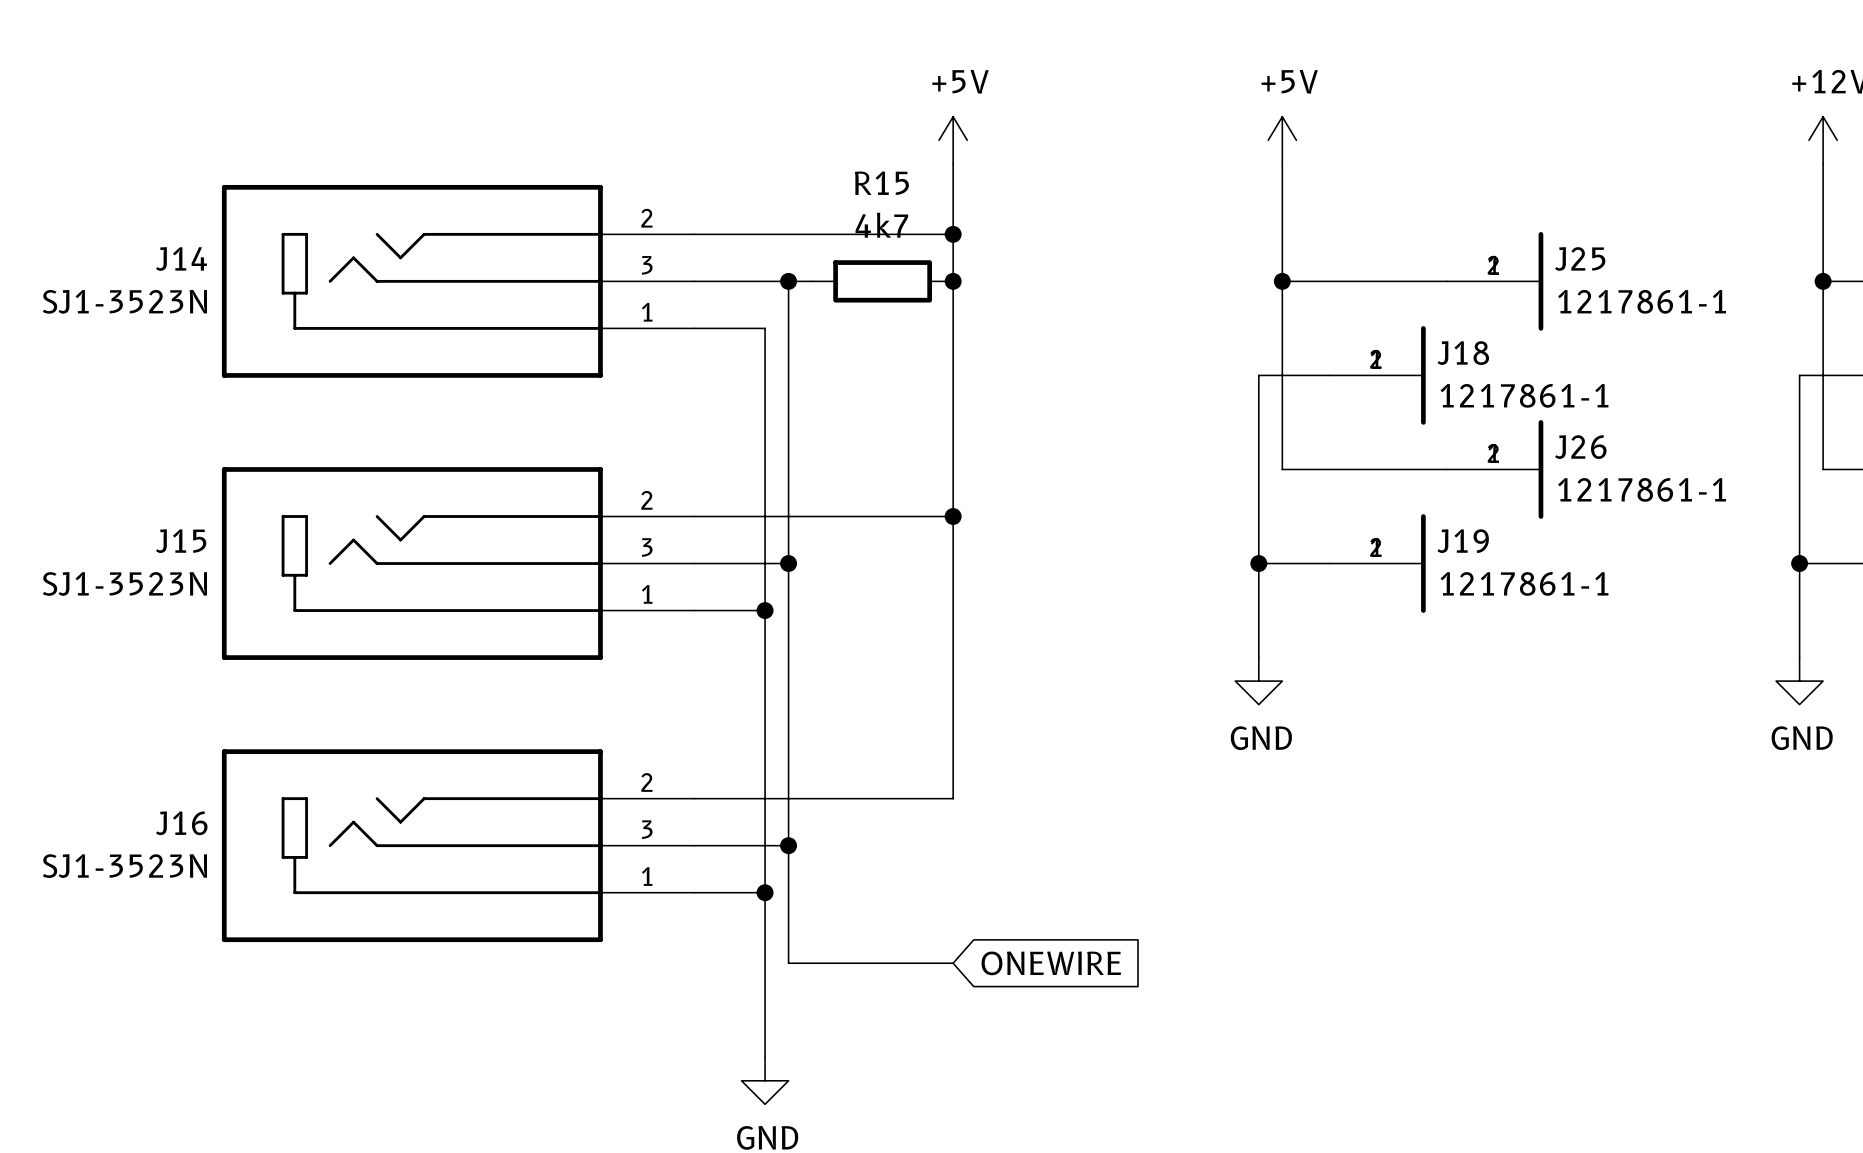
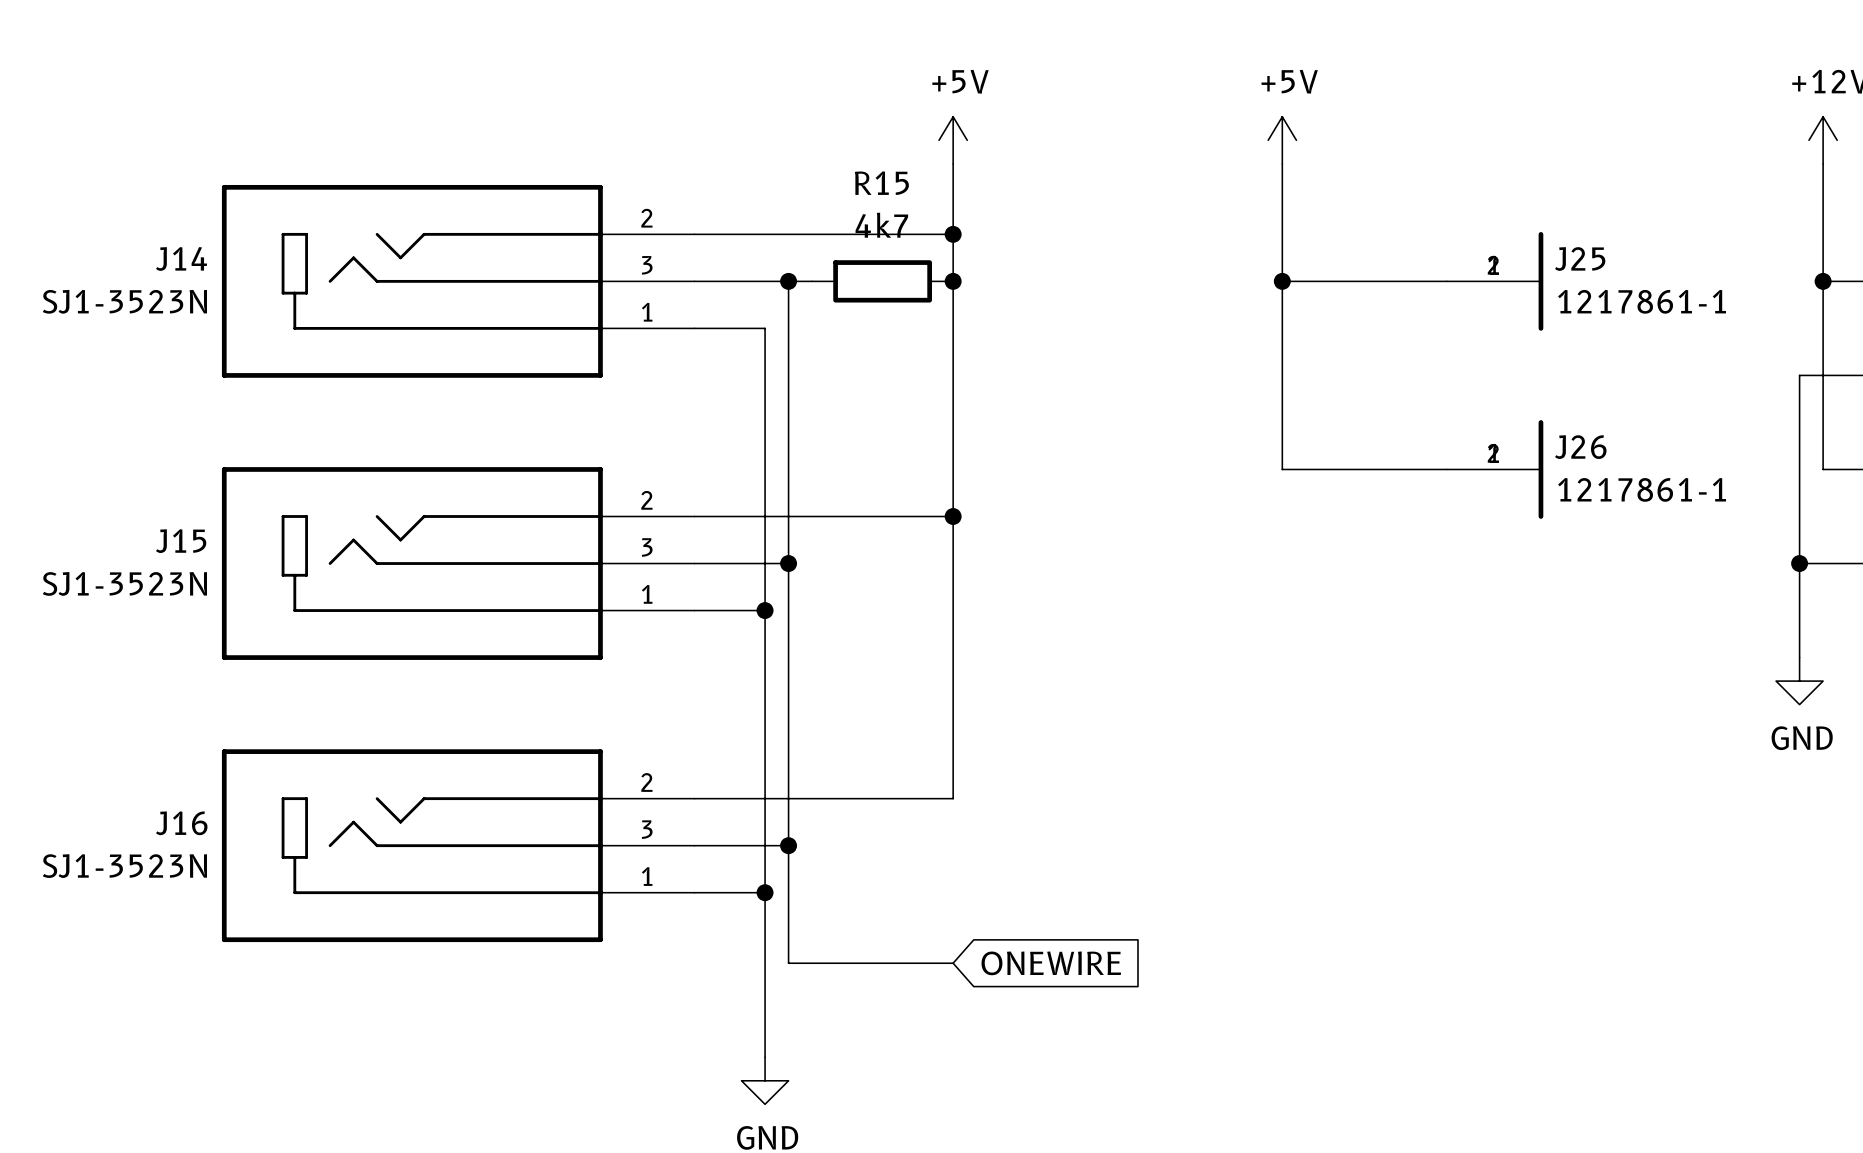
wire: (1329, 375) (1258, 375) (1258, 657) -> none
J18: 1217861-1 (1377, 375) -> none
wire: (1258, 563) (1329, 563) -> none
junction: (1258, 563) -> none
J19: 1217861-1 (1377, 563) -> none
power symbol: GND (1258, 681) -> none

